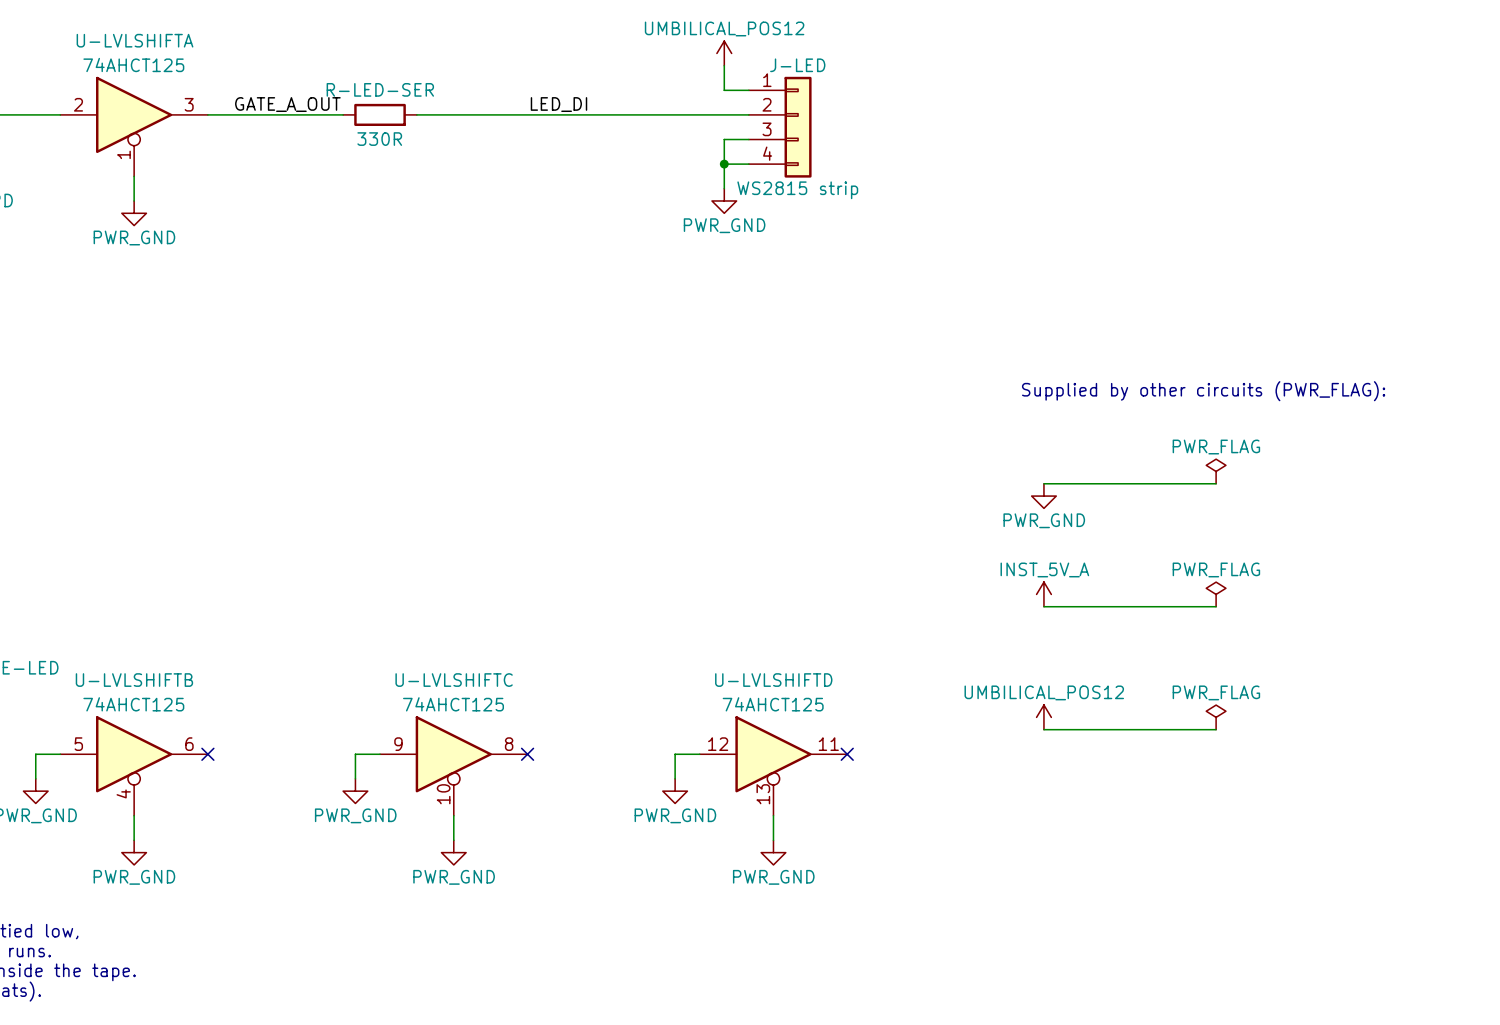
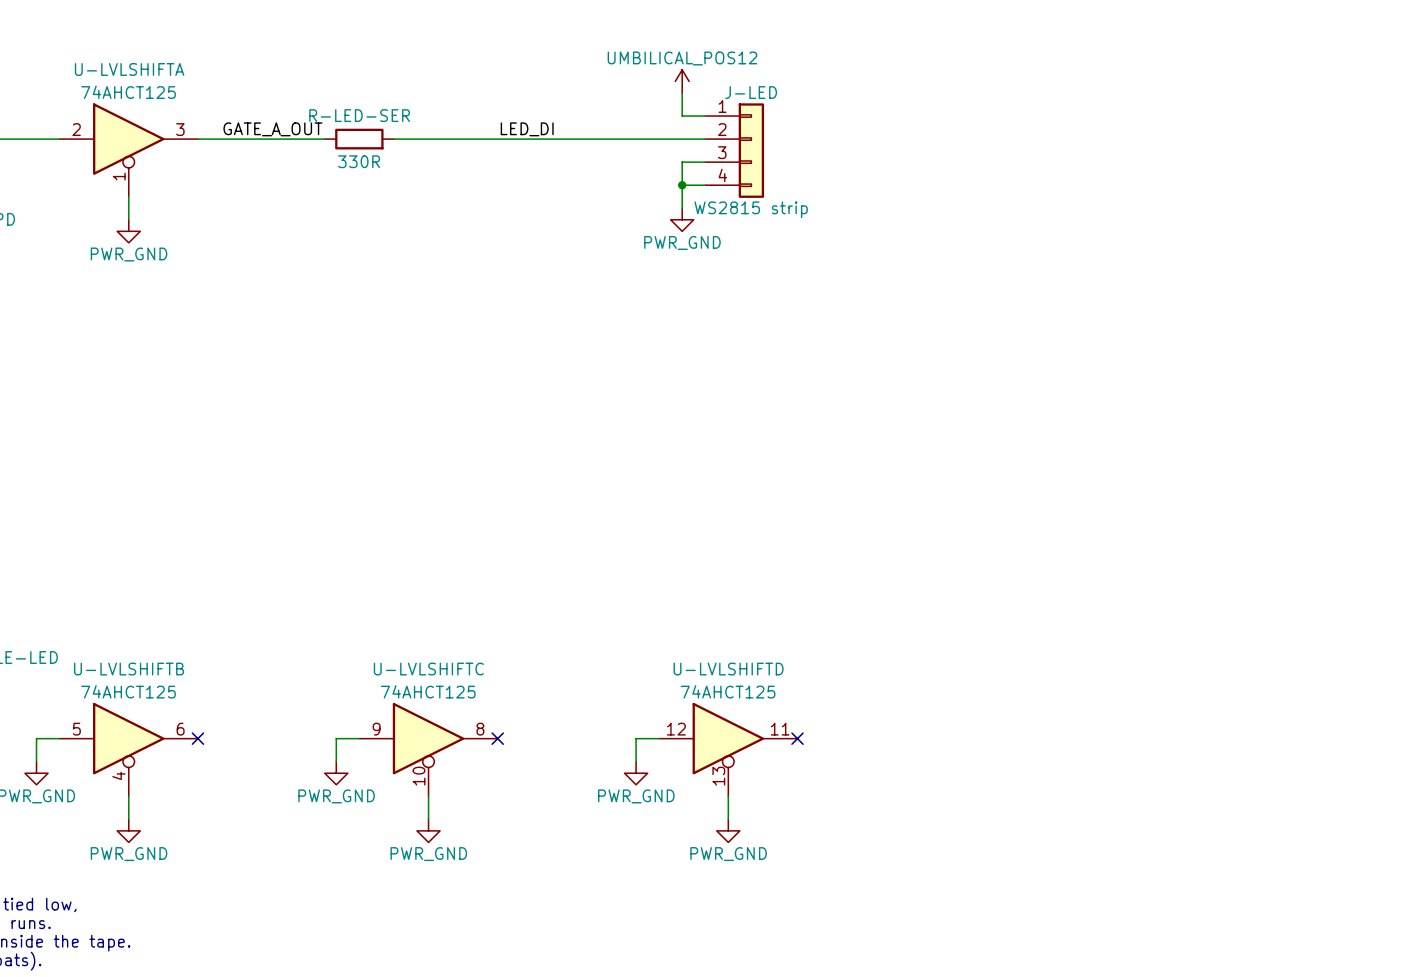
text: Supplied by other circuits (PWR_FLAG): (1203, 391) -> none
power symbol: PWR_FLAG (1216, 471) -> none
wire: (1043, 483) (1216, 483) -> none
power symbol: PWR_GND (1043, 496) -> none
power symbol: INST_5V_A (1043, 594) -> none
power symbol: PWR_FLAG (1216, 594) -> none
wire: (1043, 606) (1216, 606) -> none
power symbol: UMBILICAL_POS12 (1043, 717) -> none
power symbol: PWR_FLAG (1216, 717) -> none
wire: (1043, 729) (1216, 729) -> none

